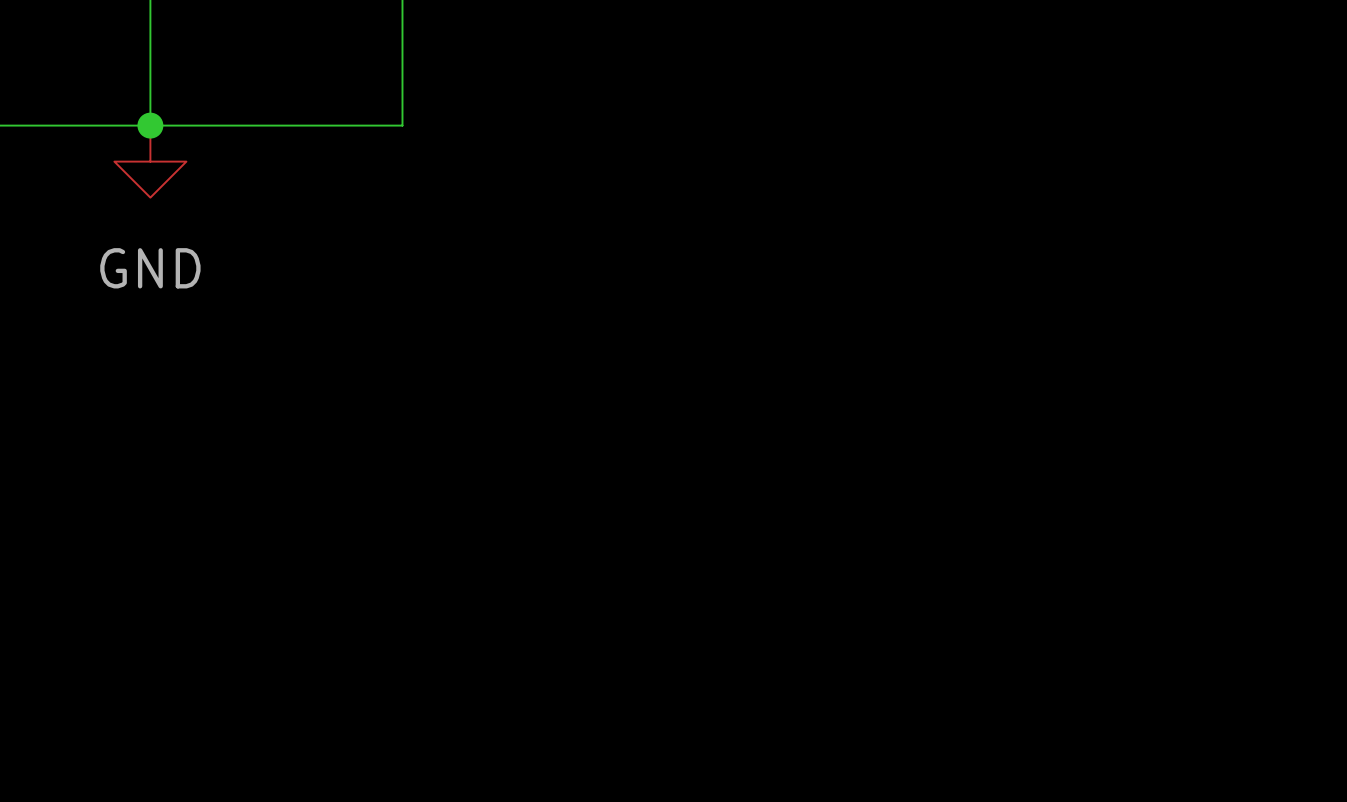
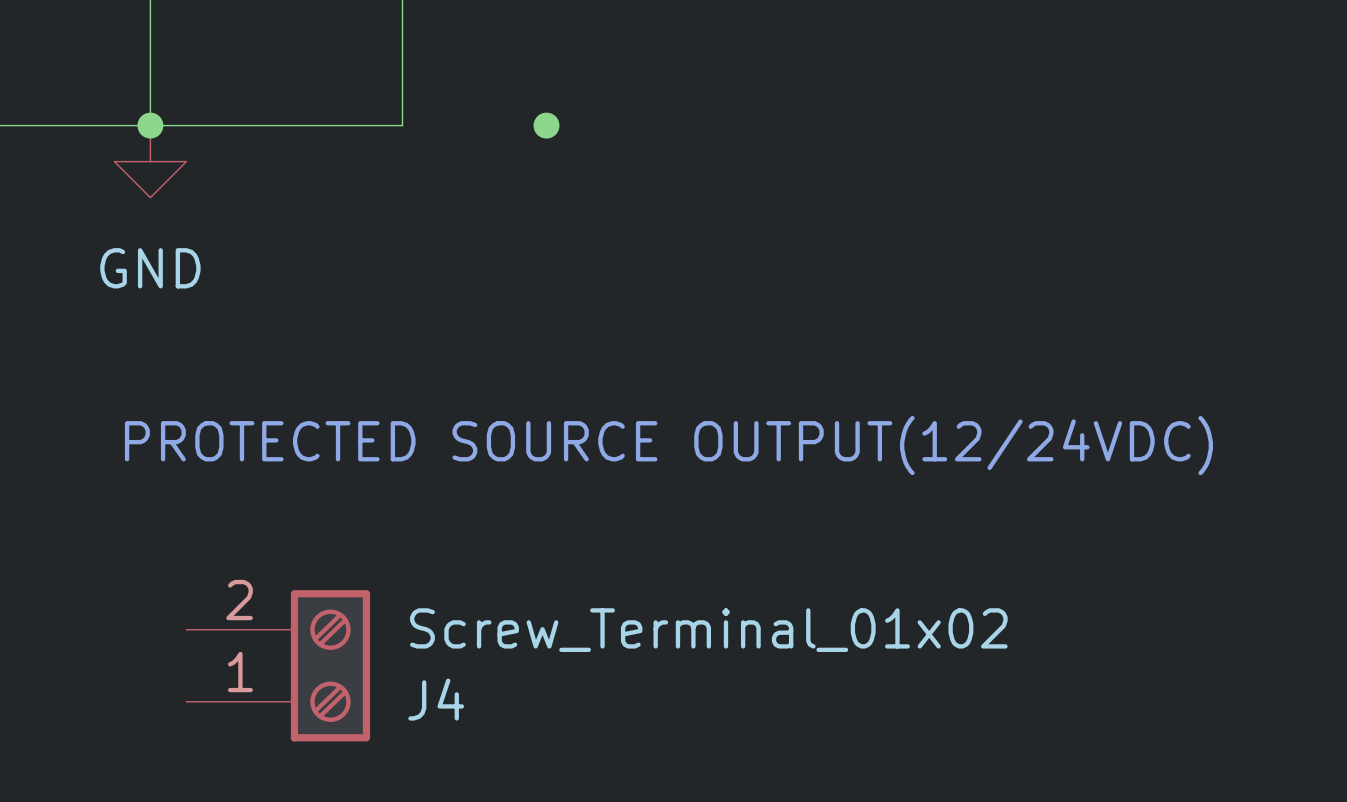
junction: none -> (546, 125)
text: none -> PROTECTED SOURCE OUTPUT(12/24VDC) (668, 445)
J4: none -> Screw_Terminal_01x02 (278, 665)

